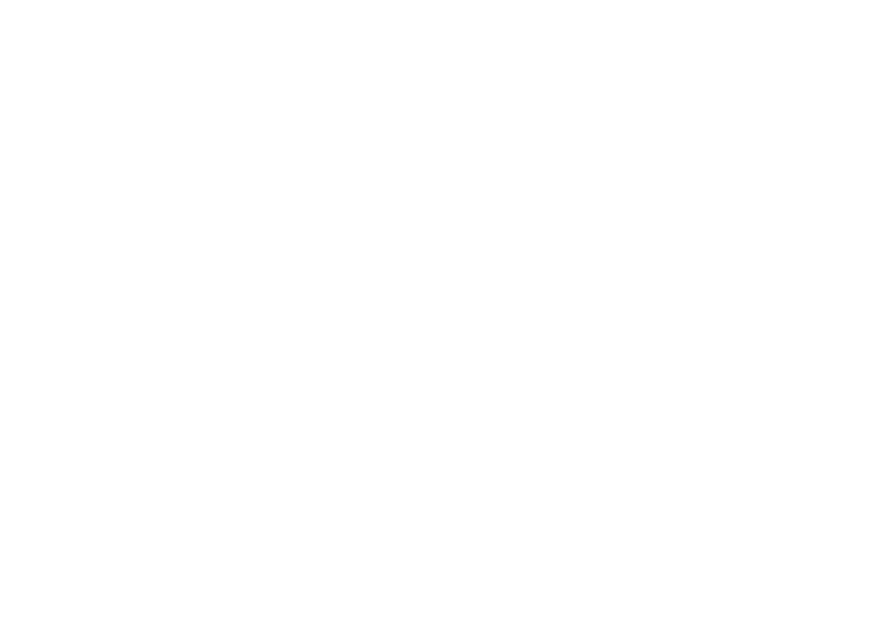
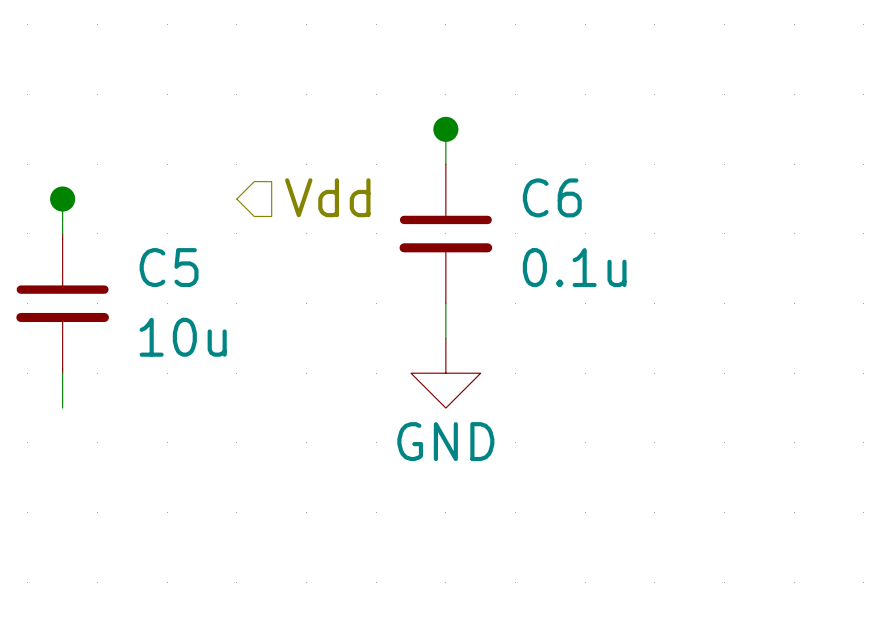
wire: none -> (445, 129) (445, 164)
junction: none -> (445, 129)
hierarchical label: none -> Vdd (327, 197)
wire: none -> (62, 199) (62, 233)
junction: none -> (62, 199)
C6: none -> 0.1u (445, 233)
C5: none -> 10u (62, 303)
wire: none -> (445, 303) (445, 338)
wire: none -> (62, 373) (62, 408)
power symbol: none -> GND (445, 373)

